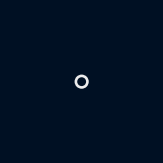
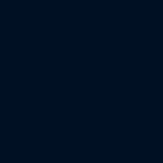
via: (81, 81) -> none

